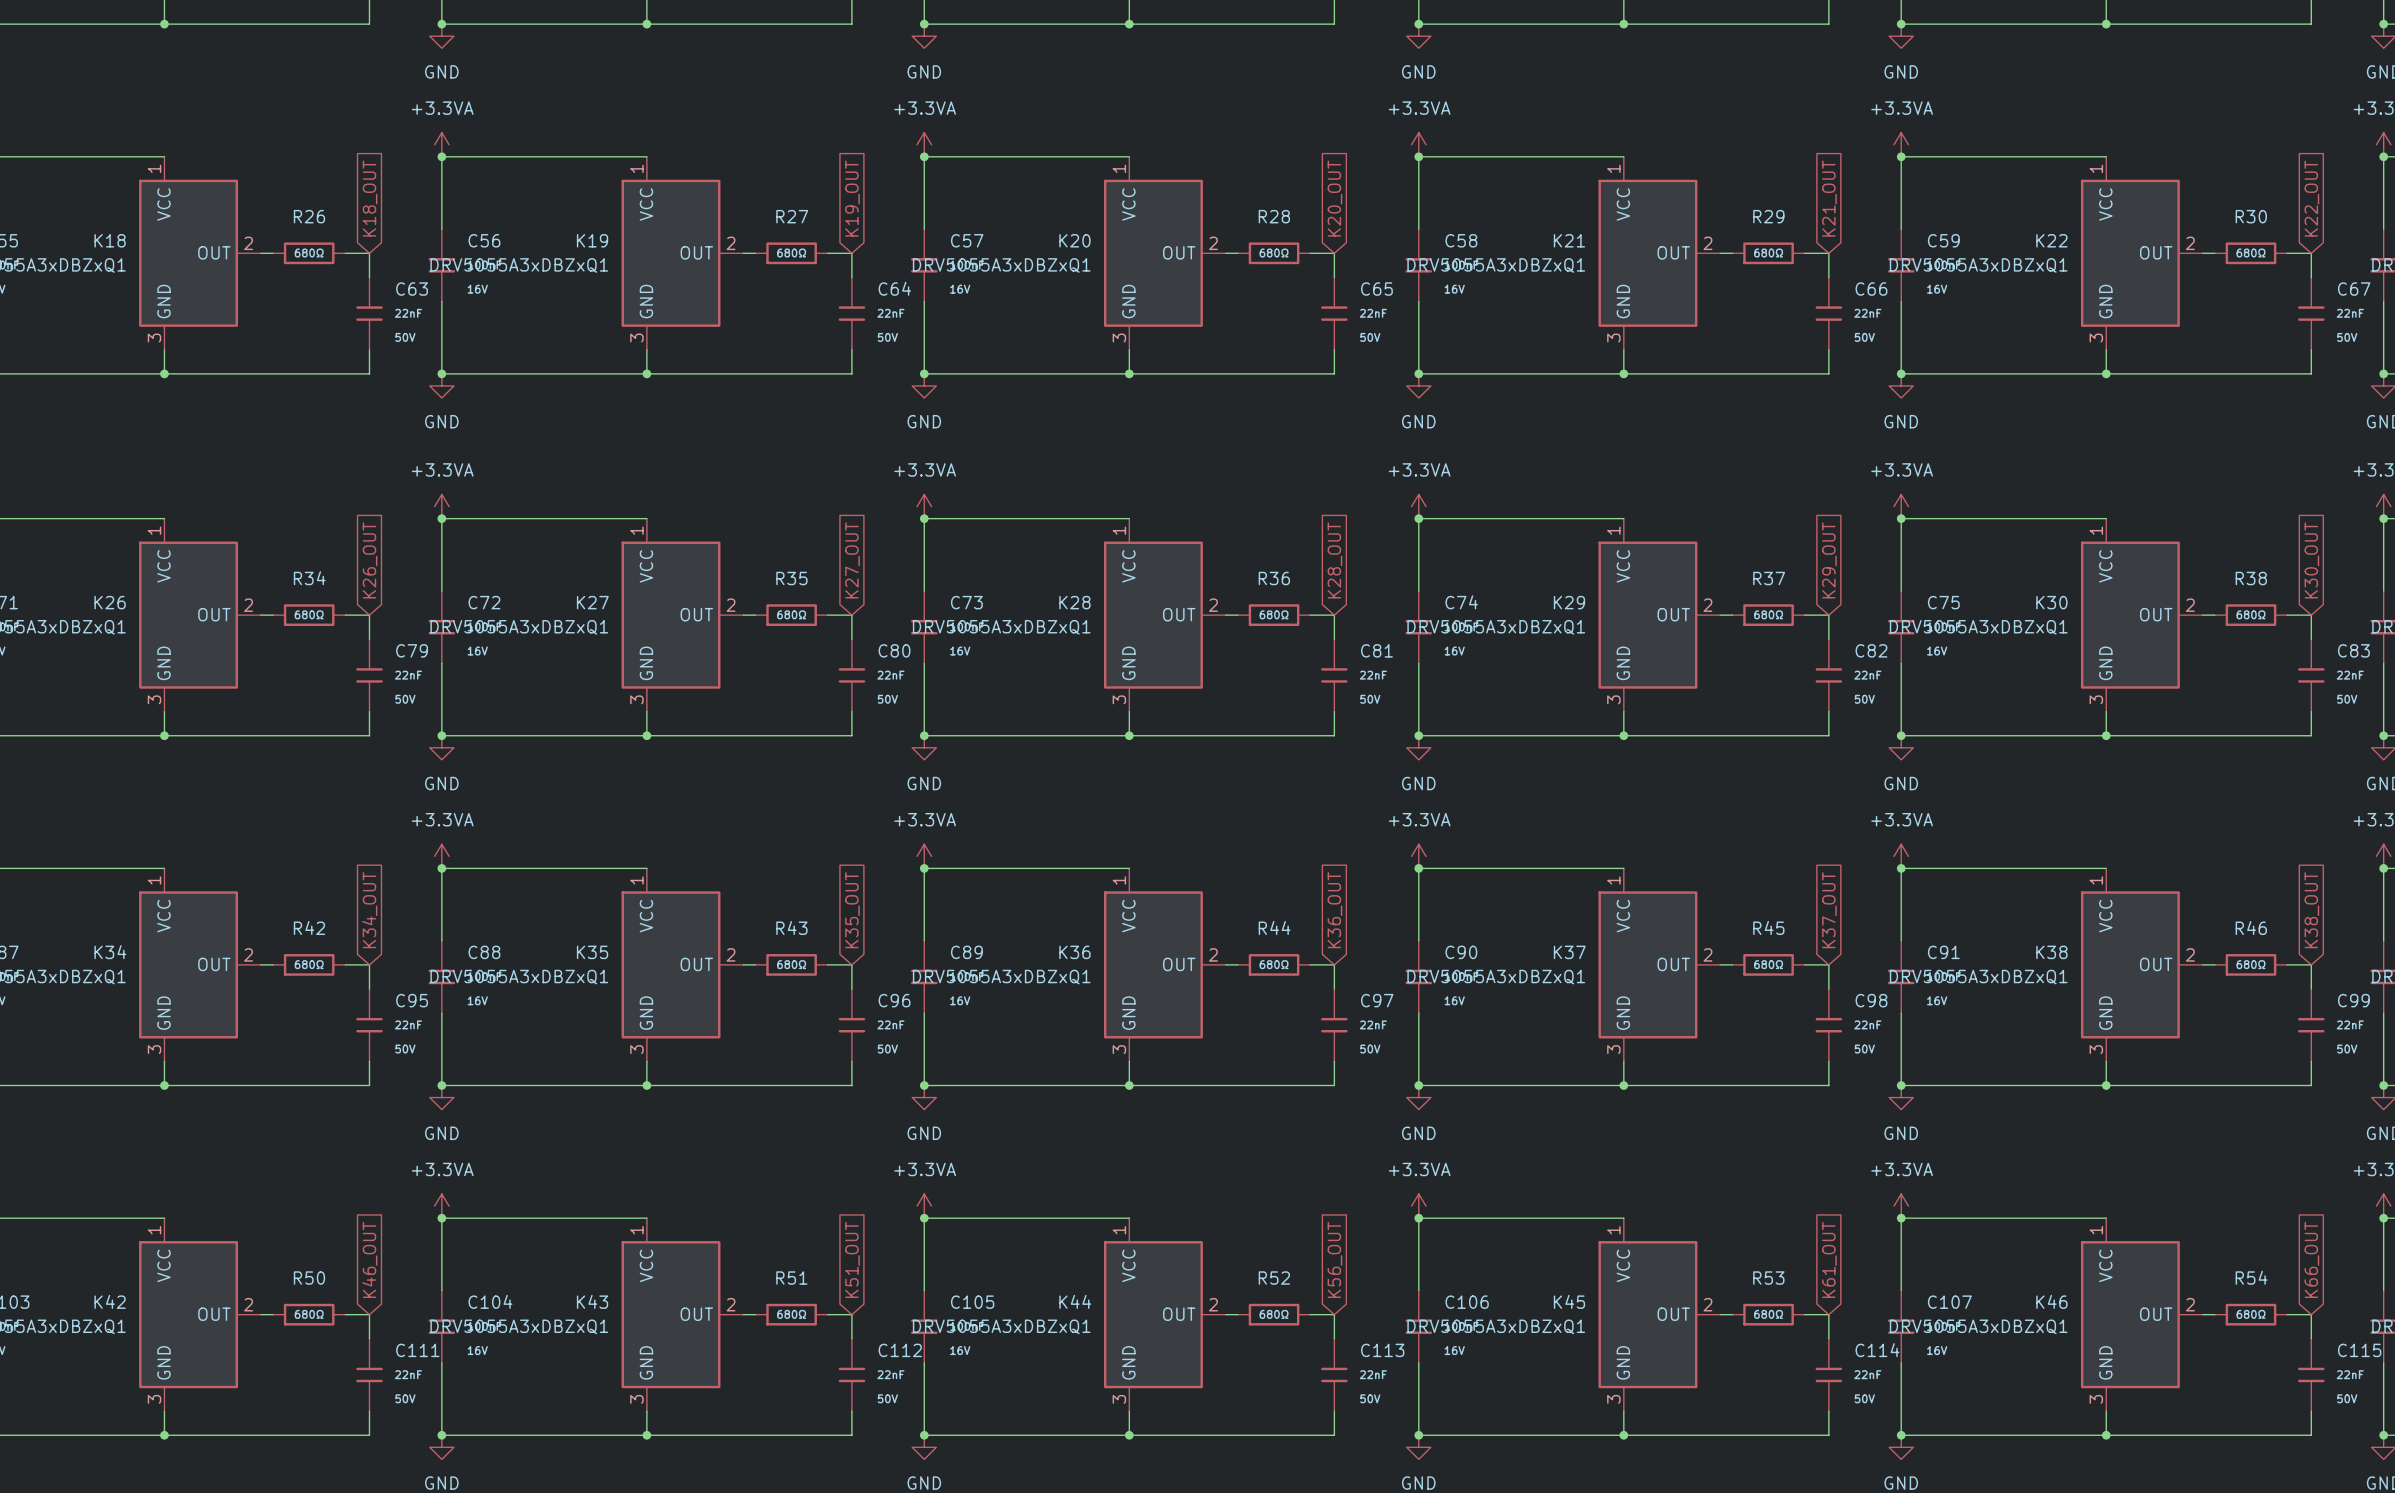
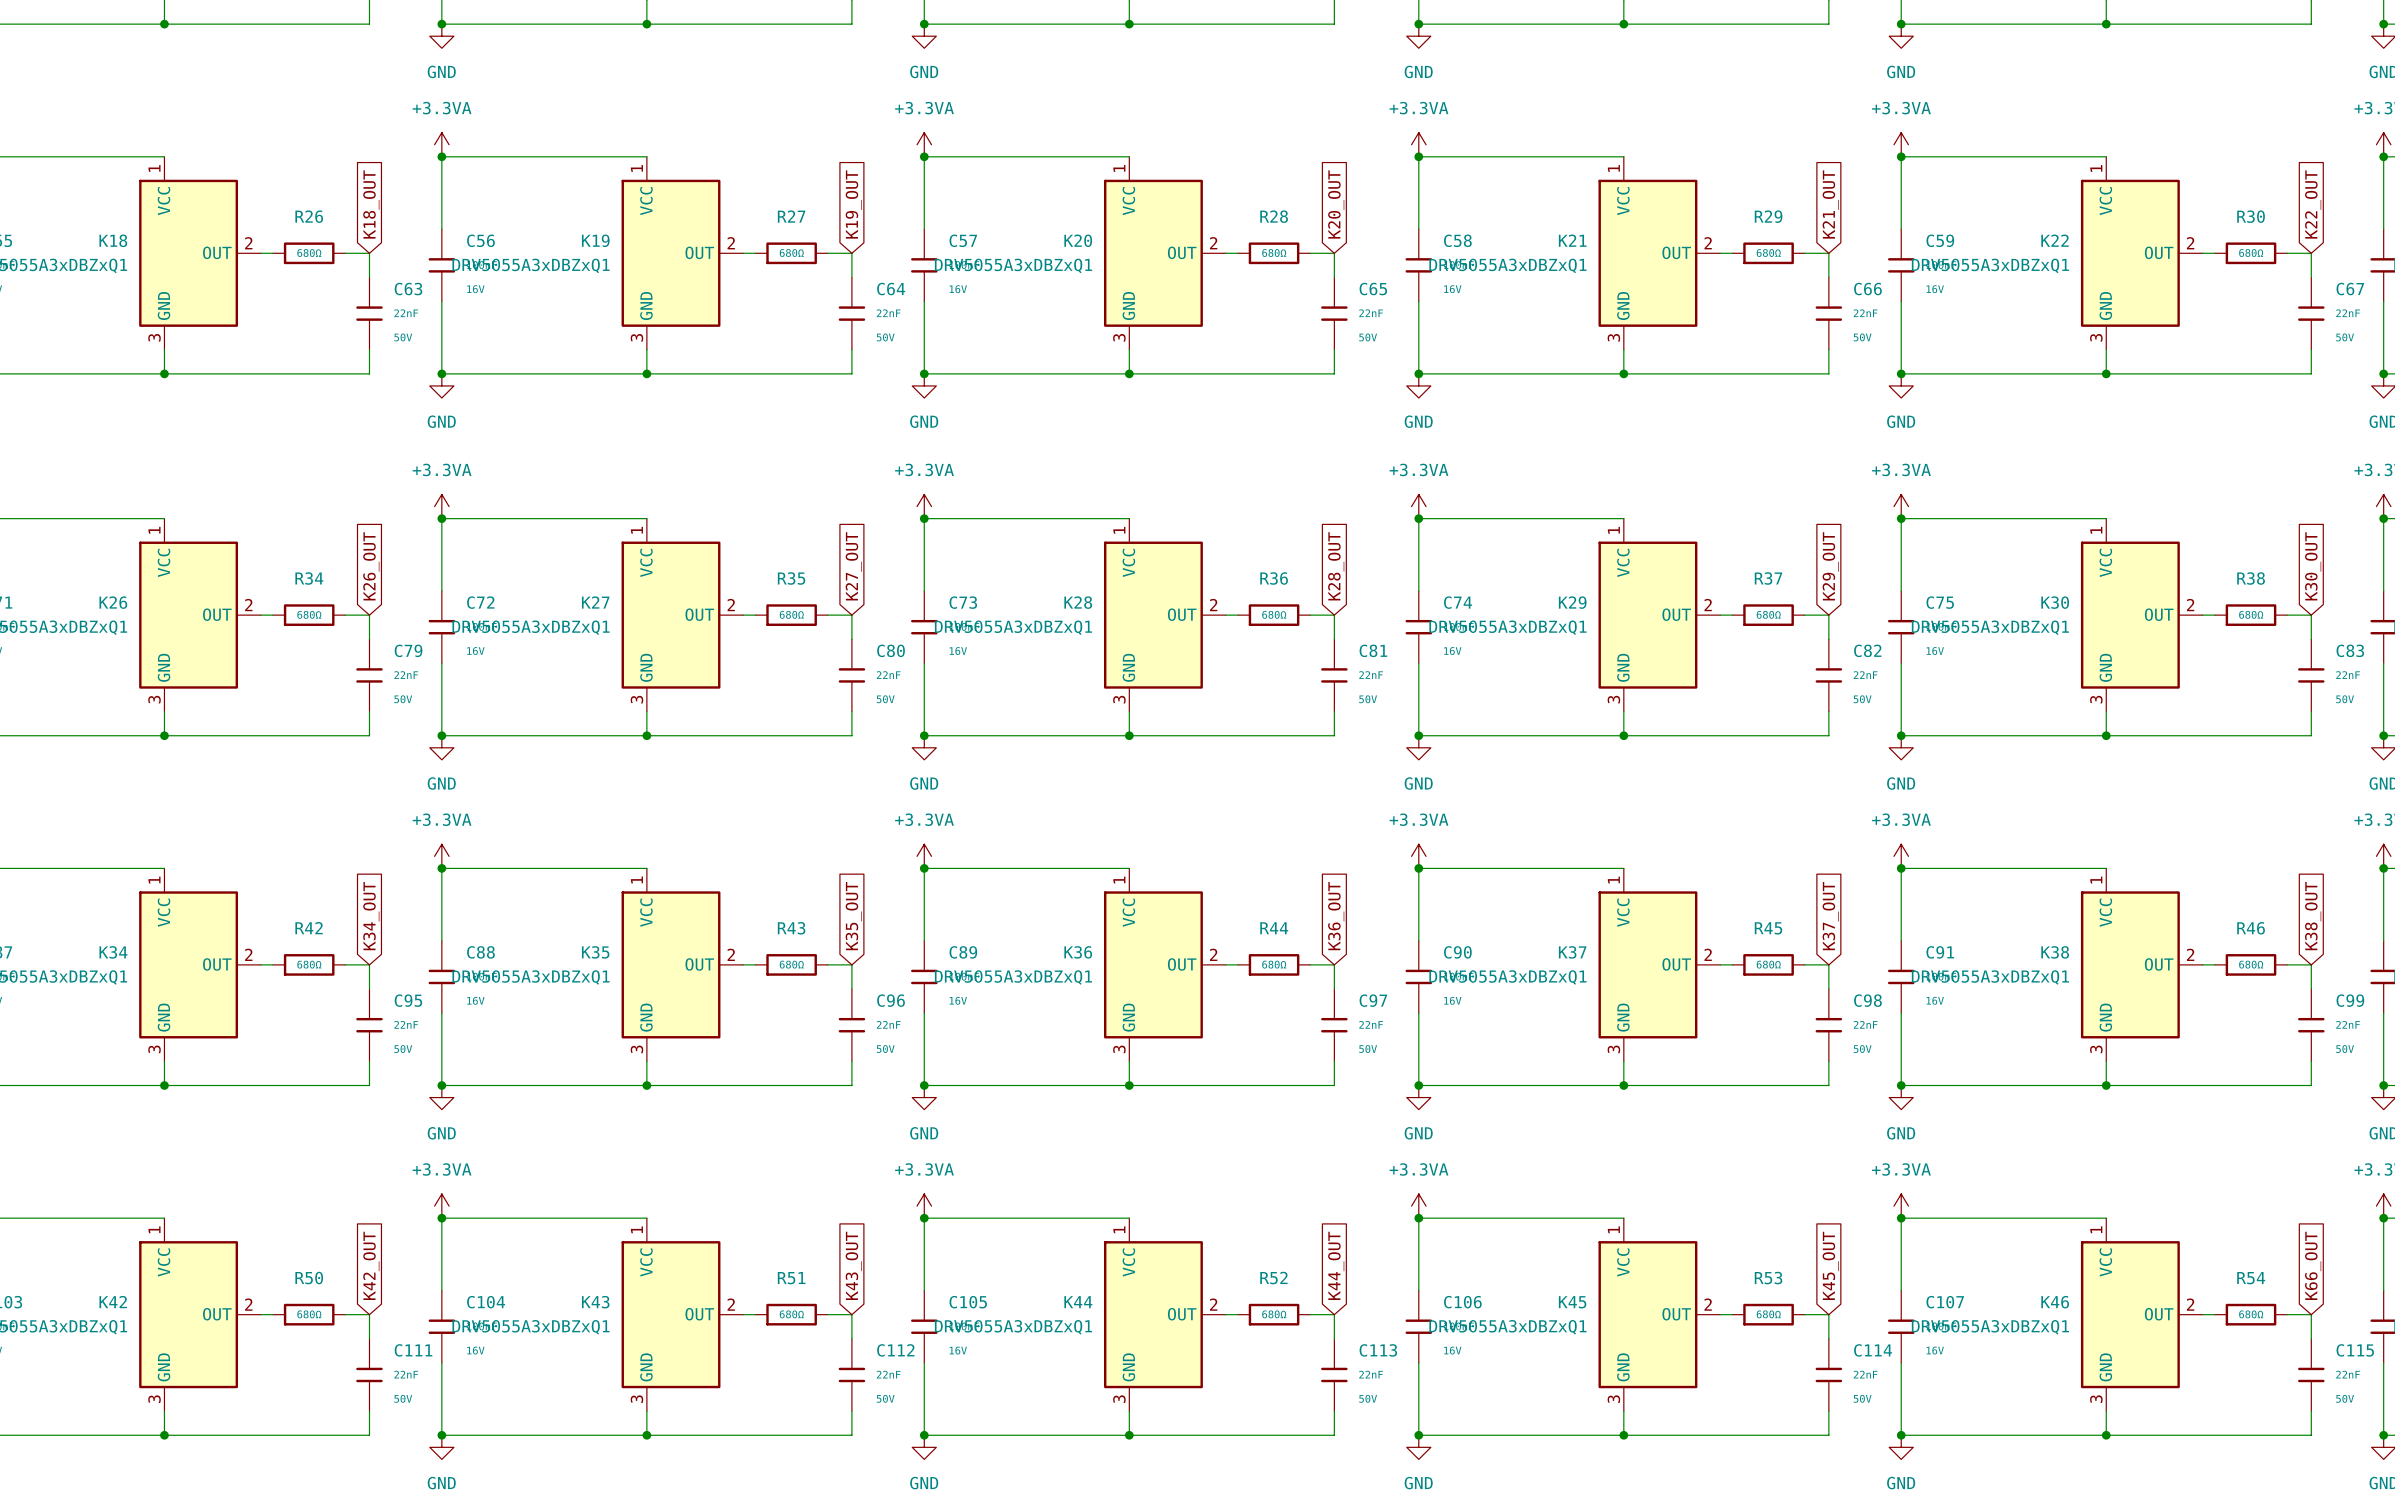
global label: K46_OUT (369, 1259) -> K42_OUT (371, 1265)
global label: K51_OUT (852, 1259) -> K43_OUT (853, 1265)
global label: K56_OUT (1334, 1259) -> K44_OUT (1336, 1265)
global label: K61_OUT (1829, 1259) -> K45_OUT (1830, 1265)

